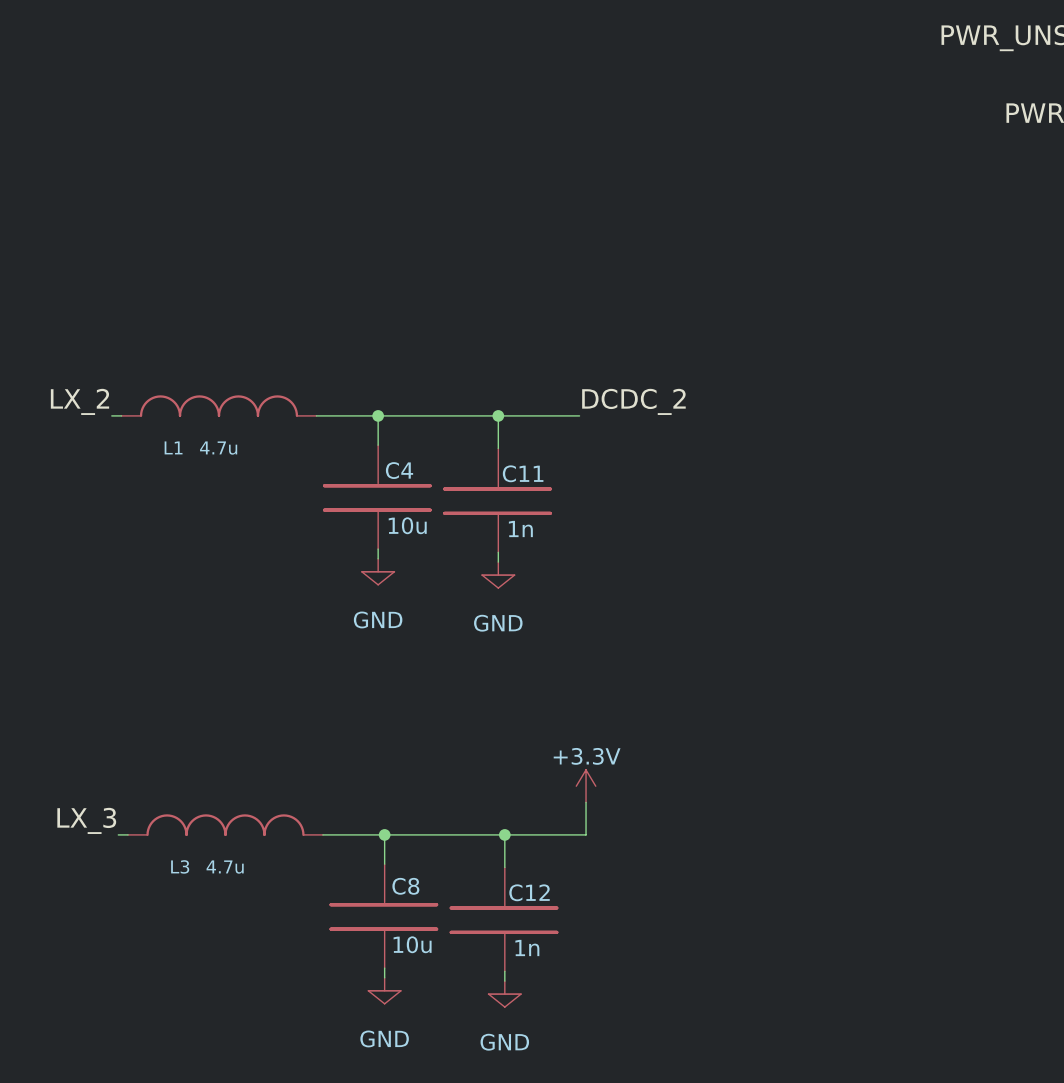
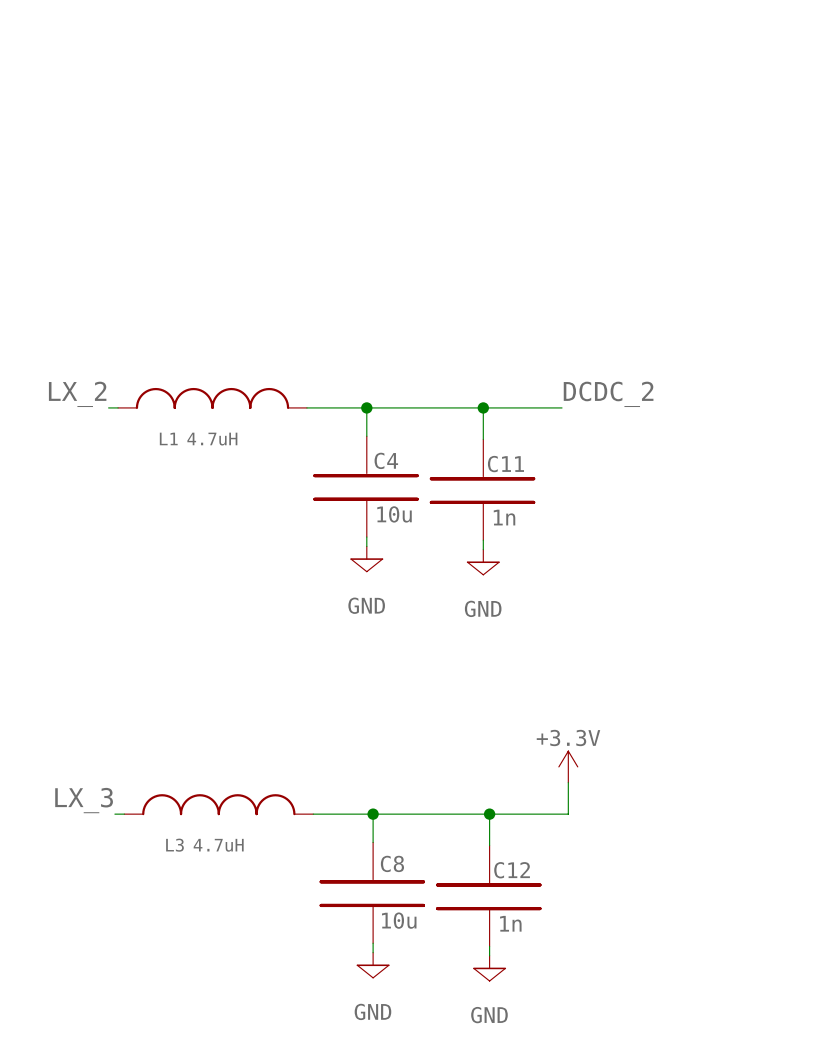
L1 value: 4.7u (218, 448) -> 4.7uH (212, 439)
L3 value: 4.7u (225, 867) -> 4.7uH (218, 845)

